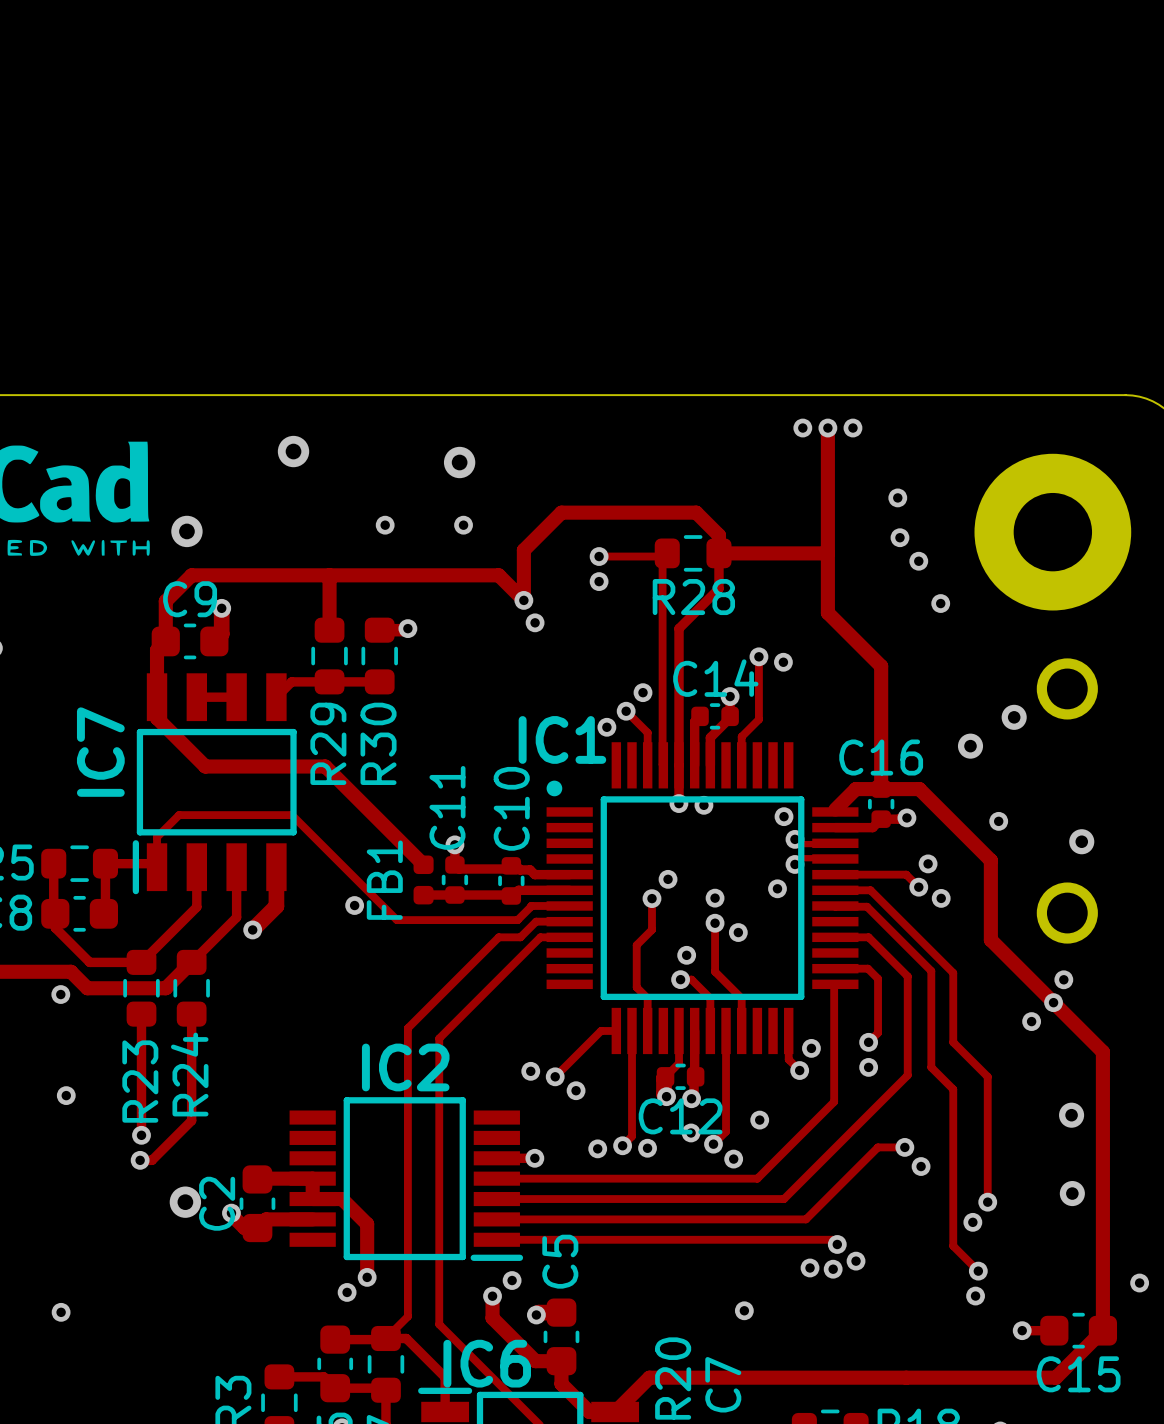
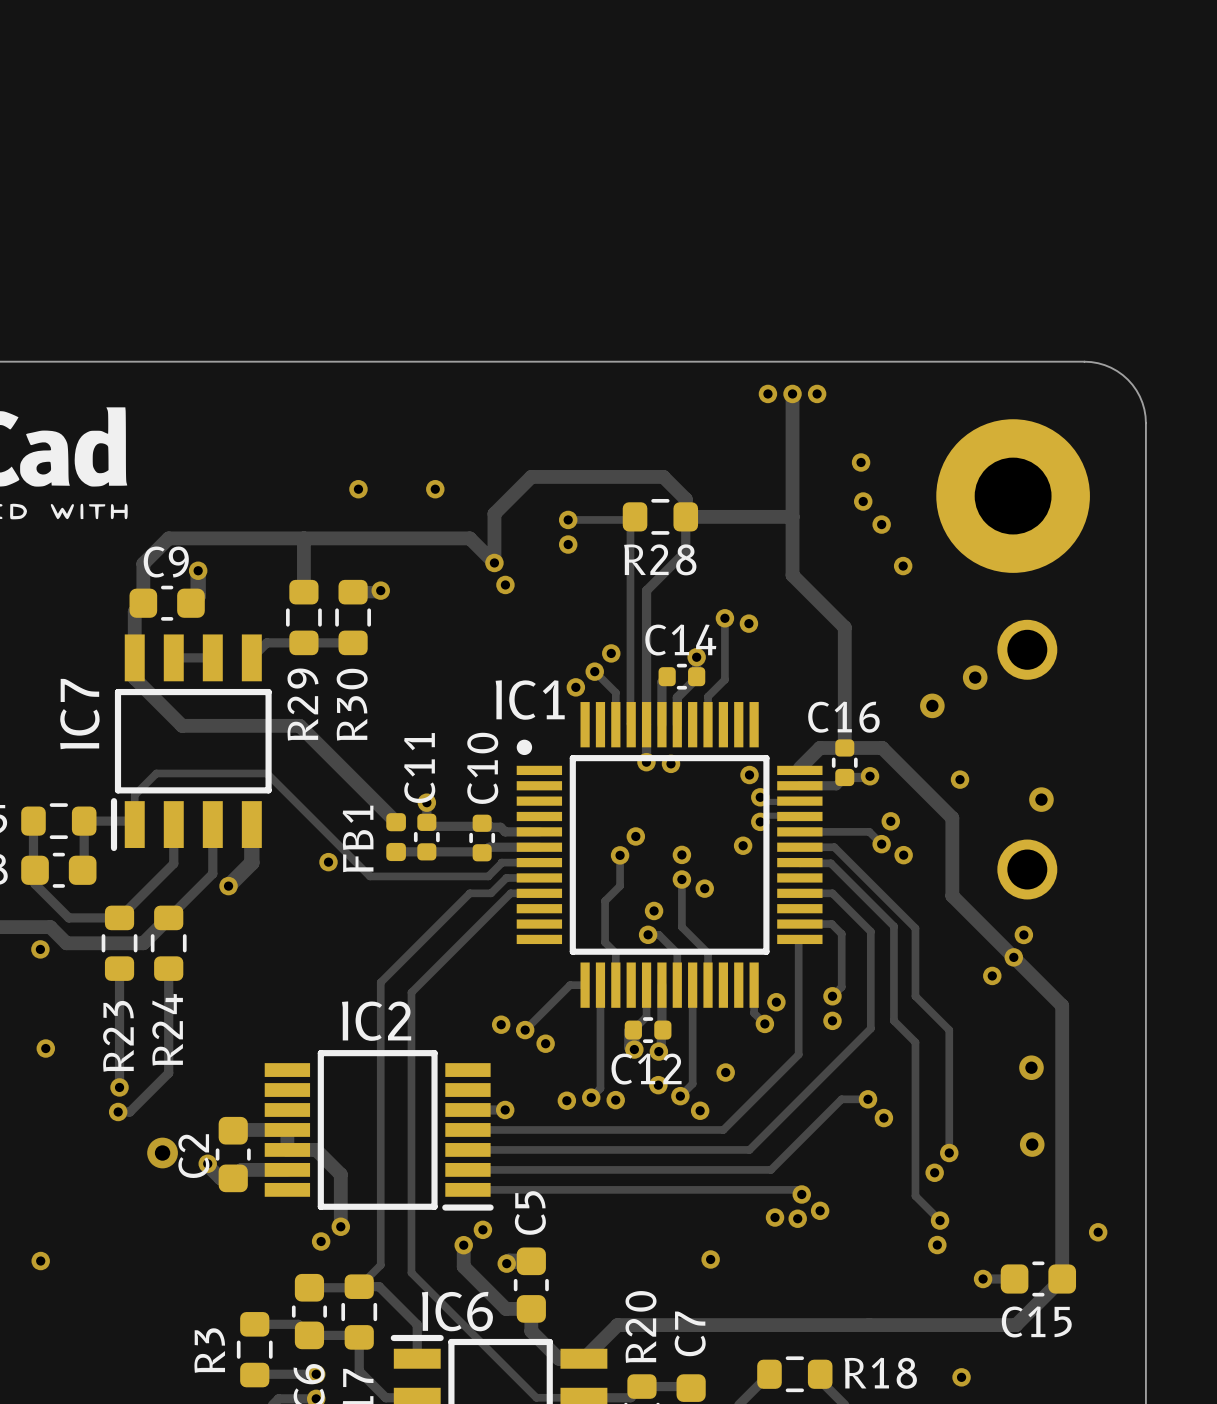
via: (293, 451) -> none
via: (459, 462) -> none
via: (186, 531) -> none

